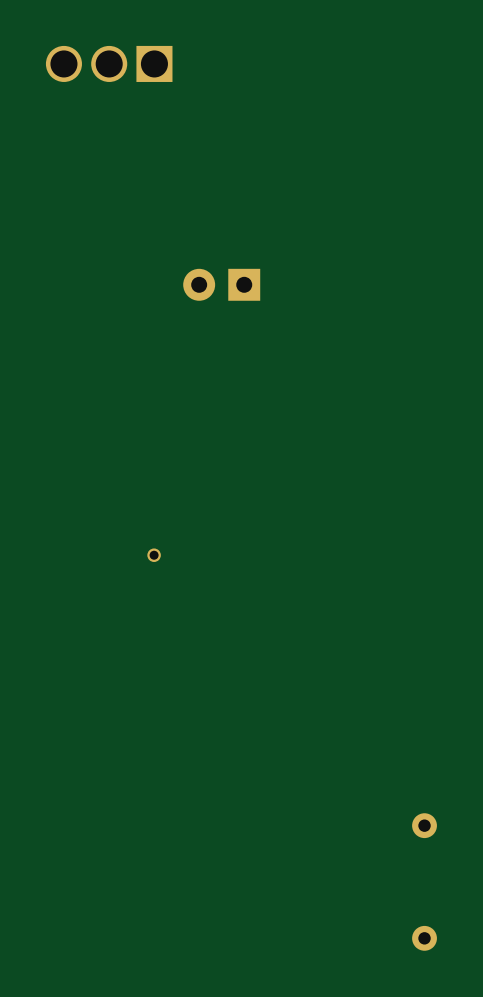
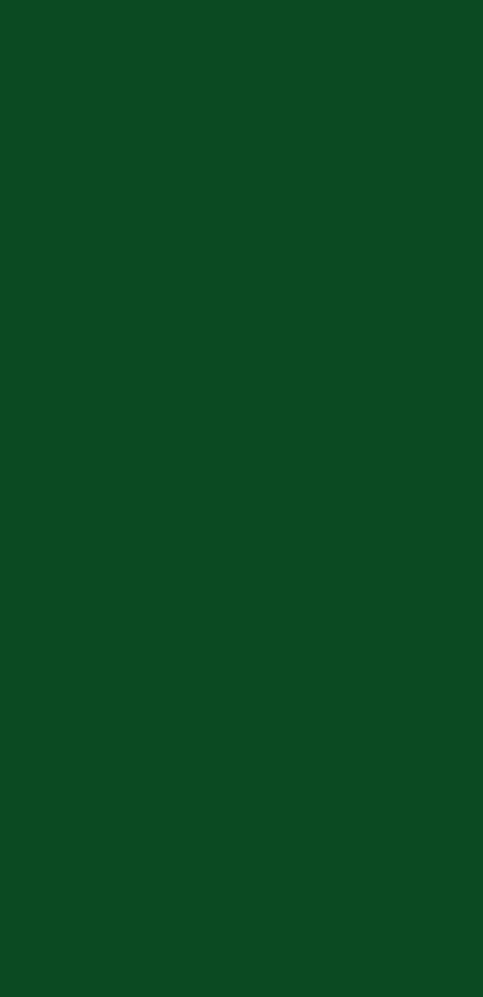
part: (109, 63) -> none
part: (221, 284) -> none
part: (154, 555) -> none
part: (424, 825) -> none
part: (424, 938) -> none

